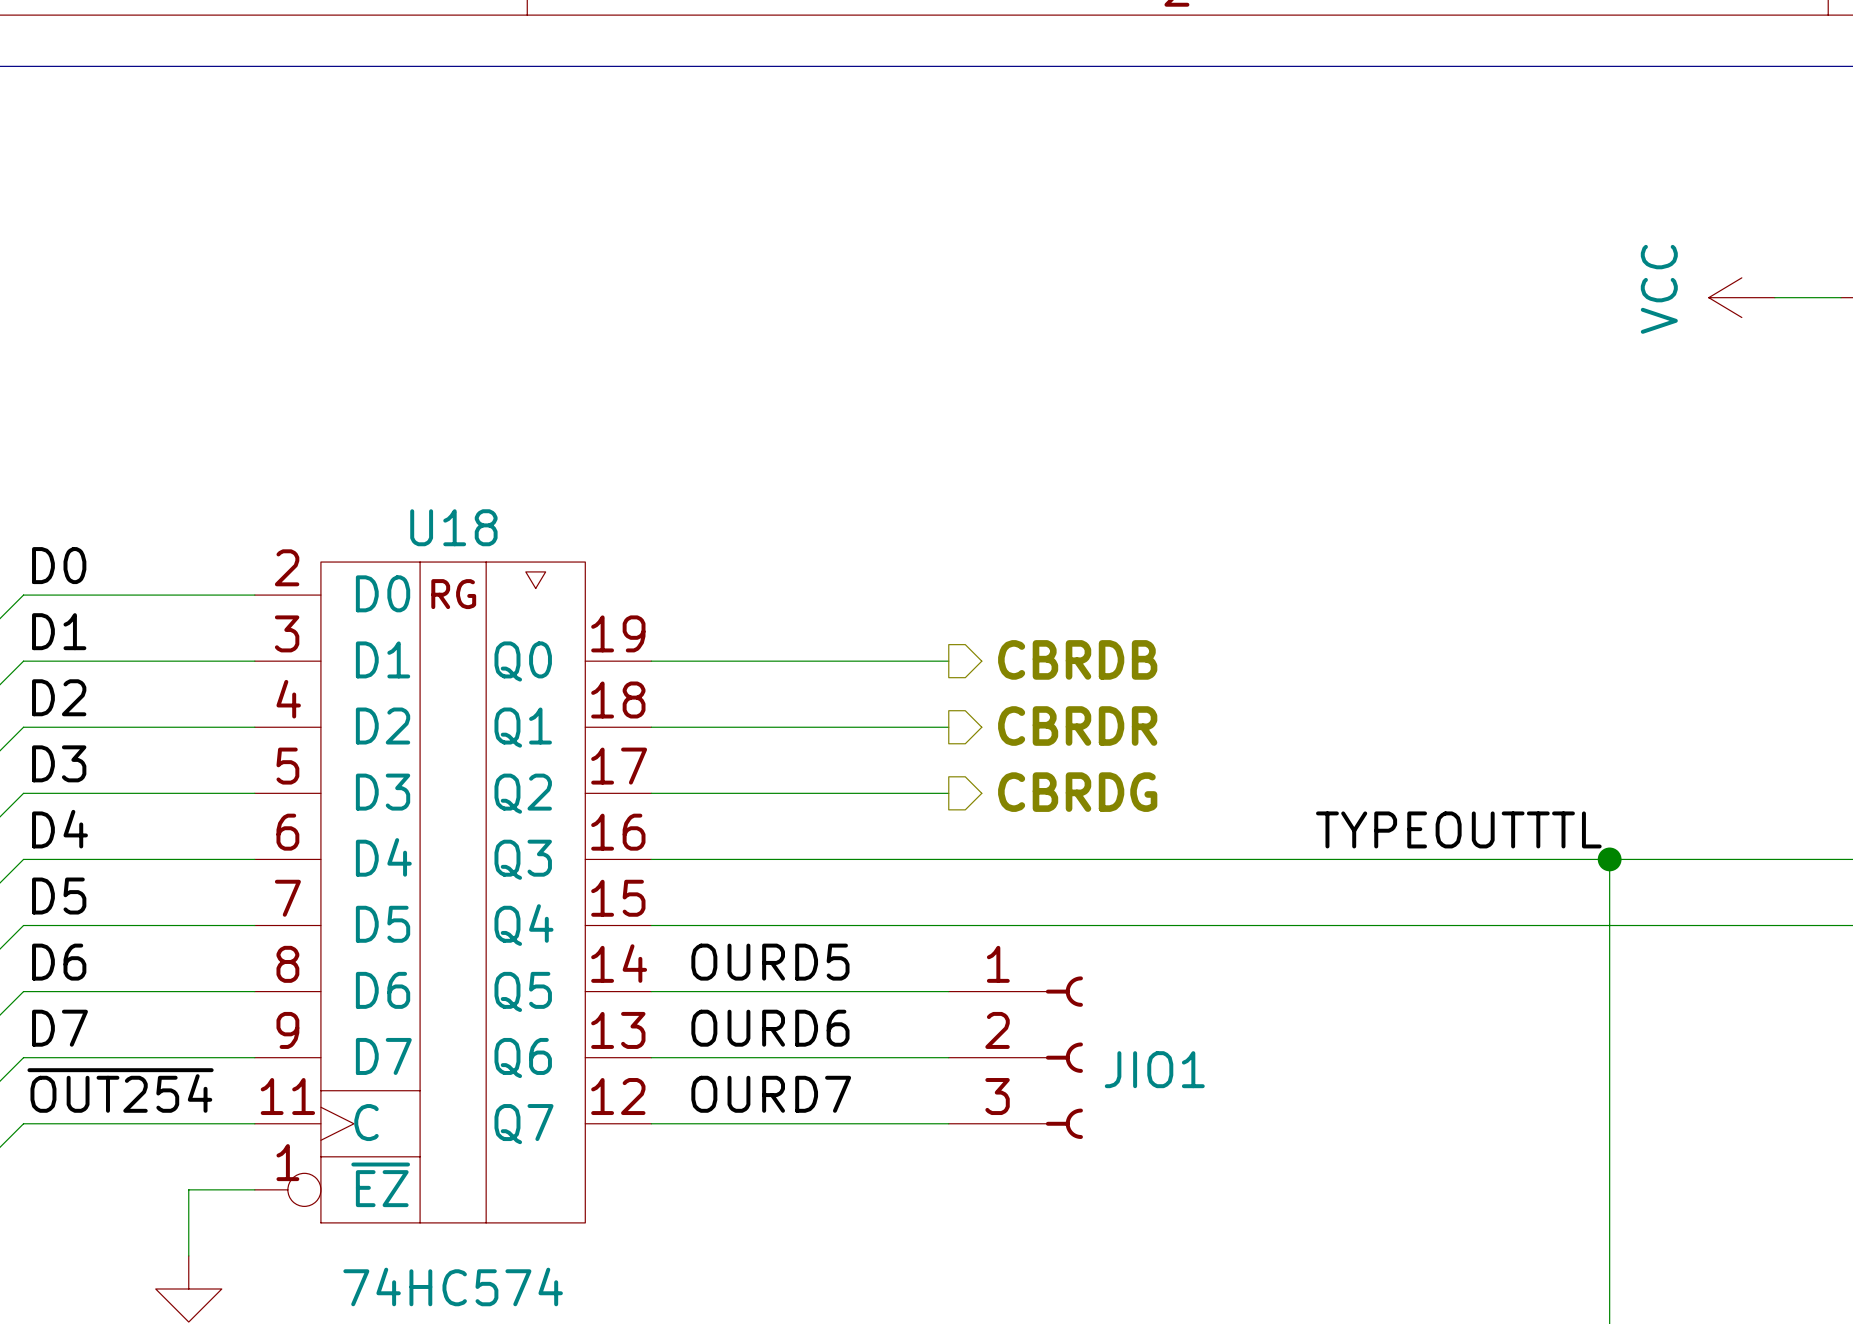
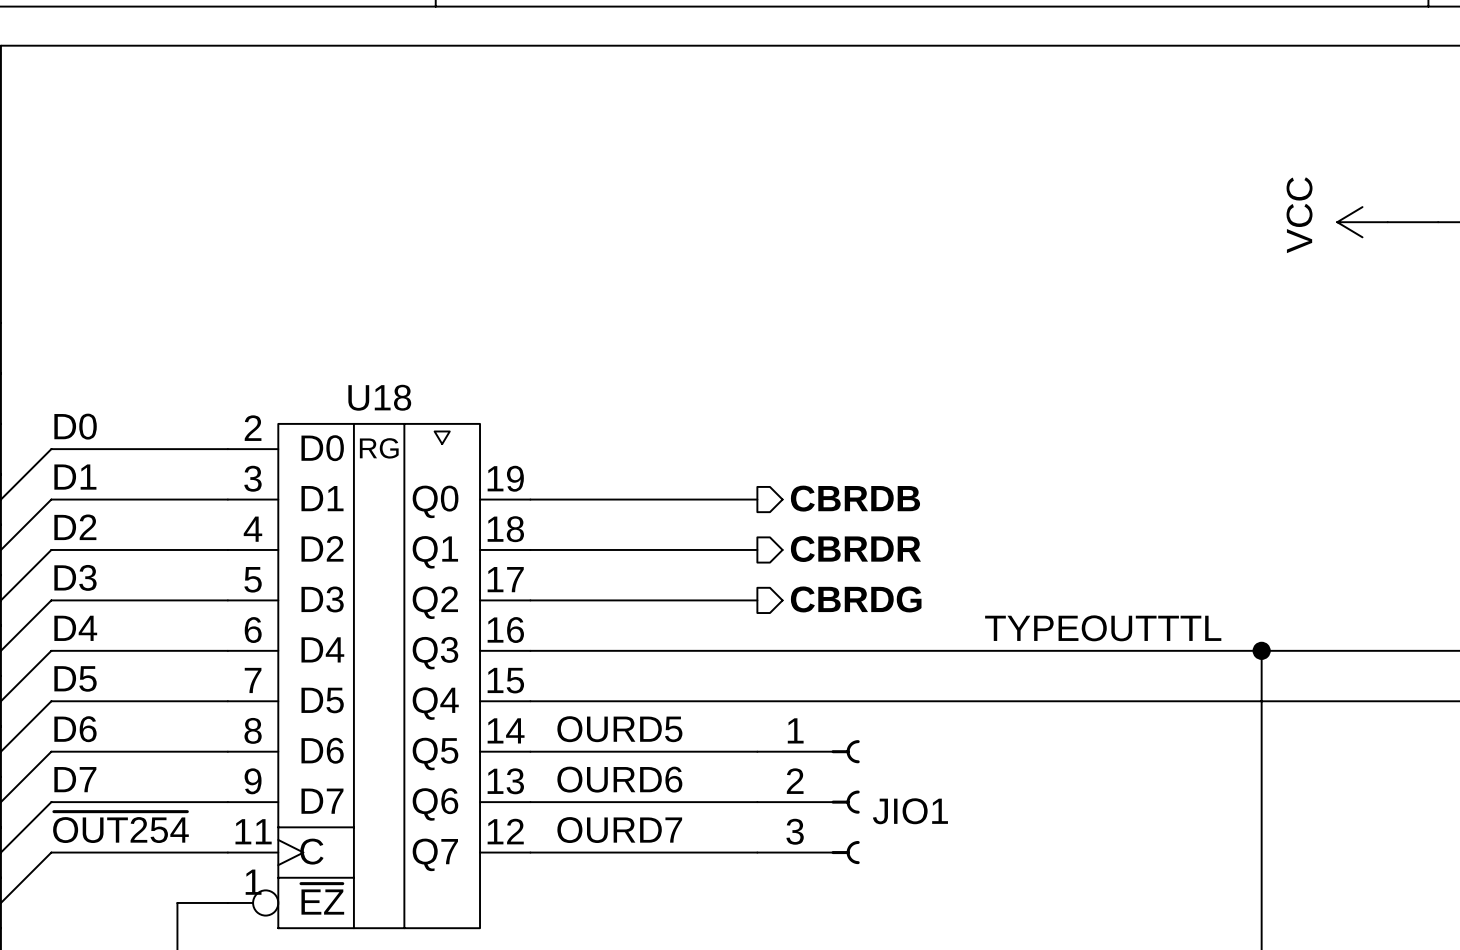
label position: TYPEOUTTTL (1458, 829) -> TYPEOUTTTL (1103, 628)

